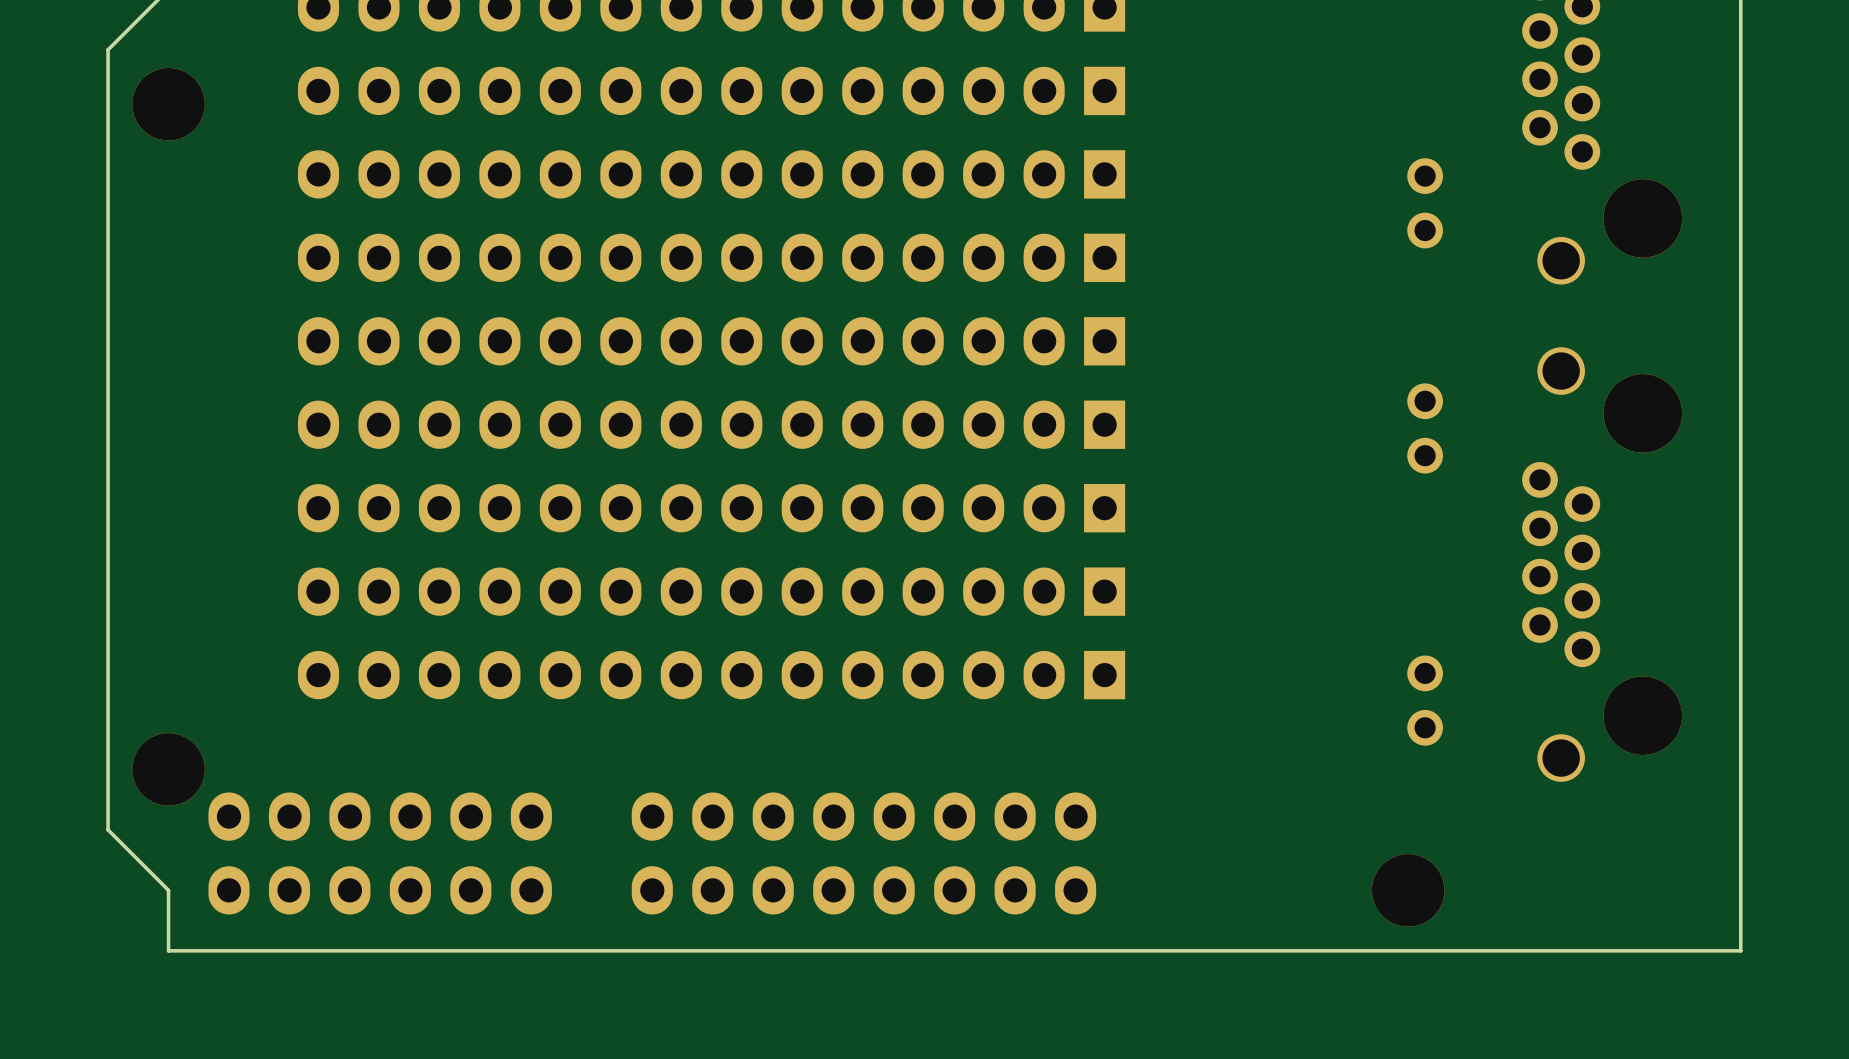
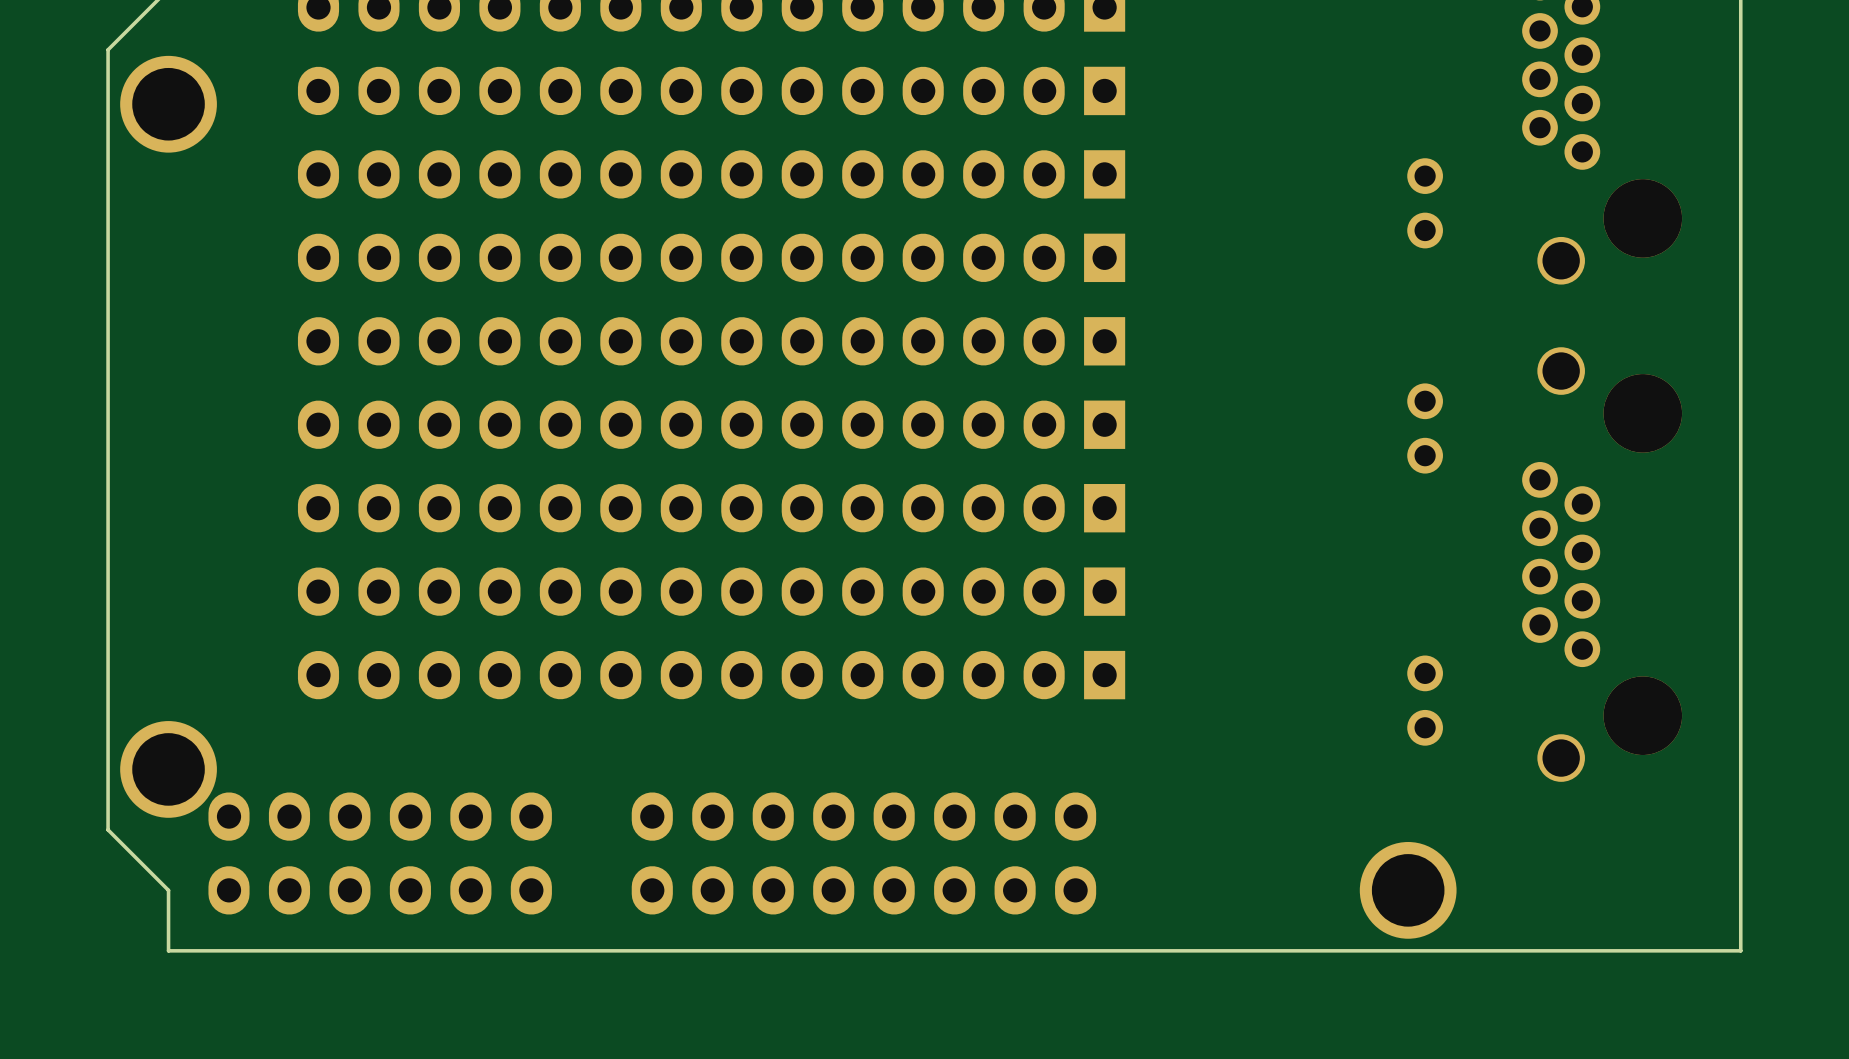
part footprint: [132, 67, 205, 141] -> [120, 55, 217, 153]
part footprint: [132, 733, 205, 806] -> [120, 721, 217, 818]
part footprint: [1371, 854, 1445, 927] -> [1359, 841, 1457, 939]

